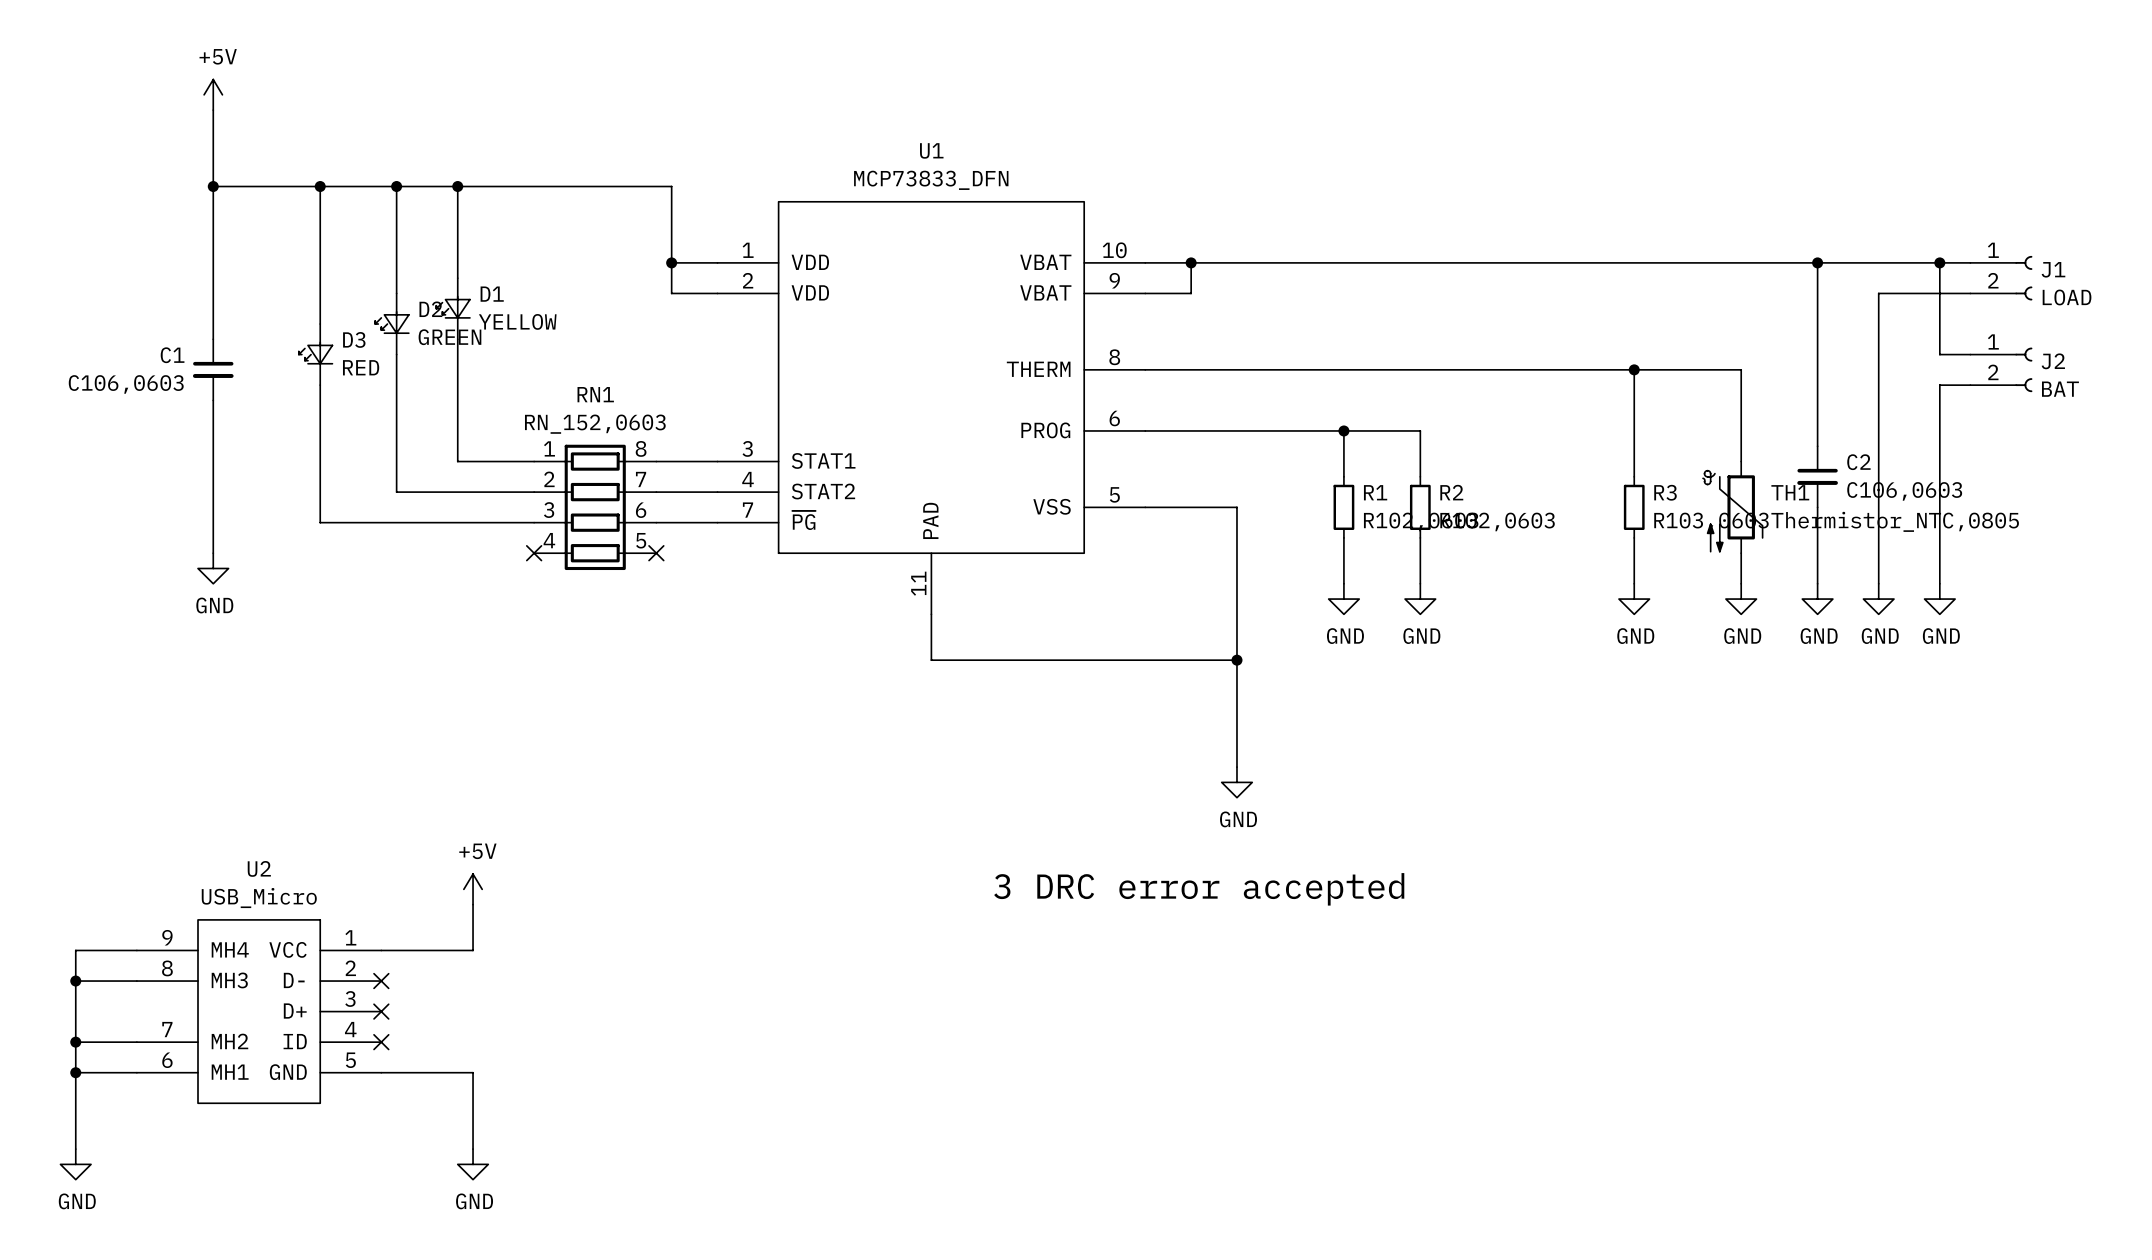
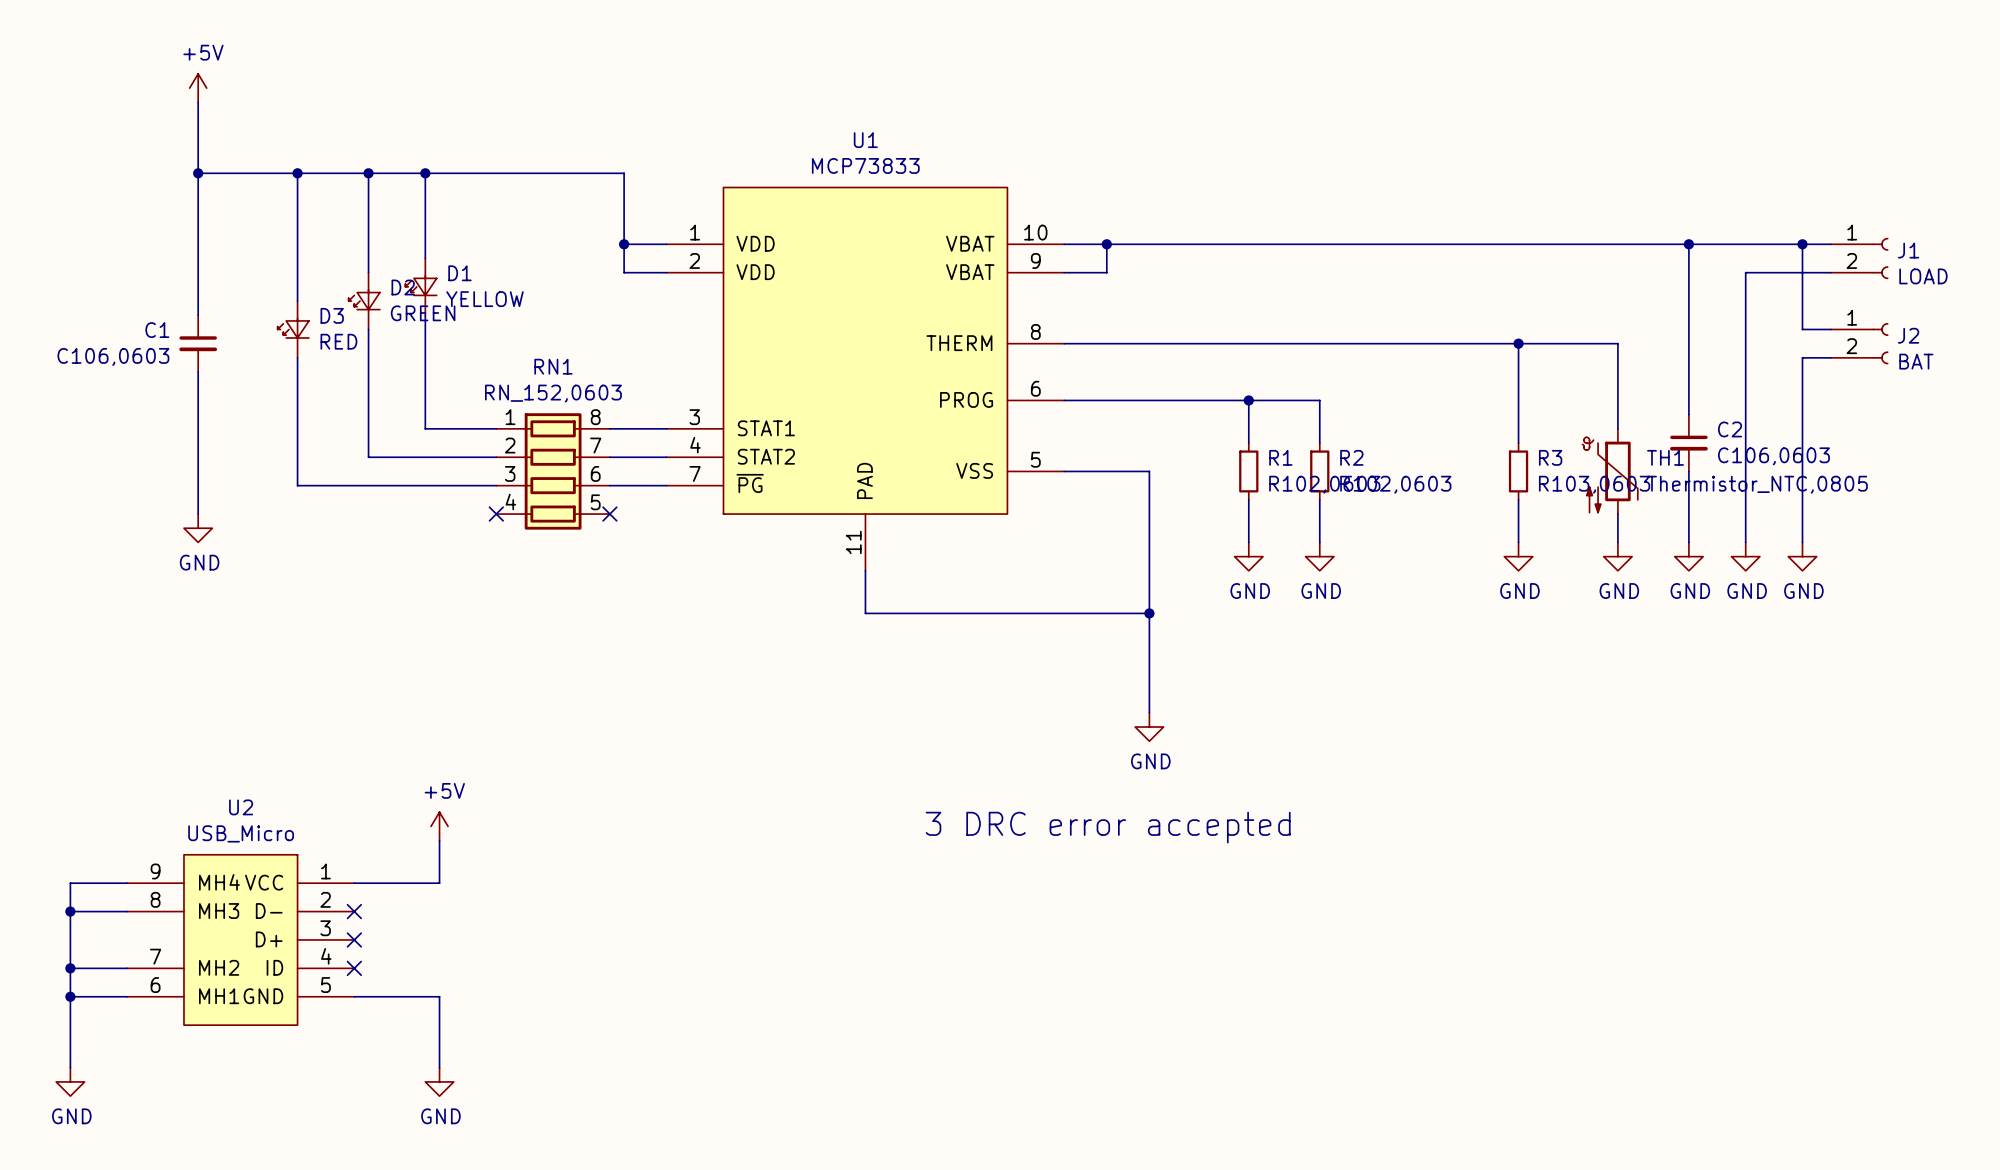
U1 value: MCP73833_DFN (931, 180) -> MCP73833 (865, 165)

